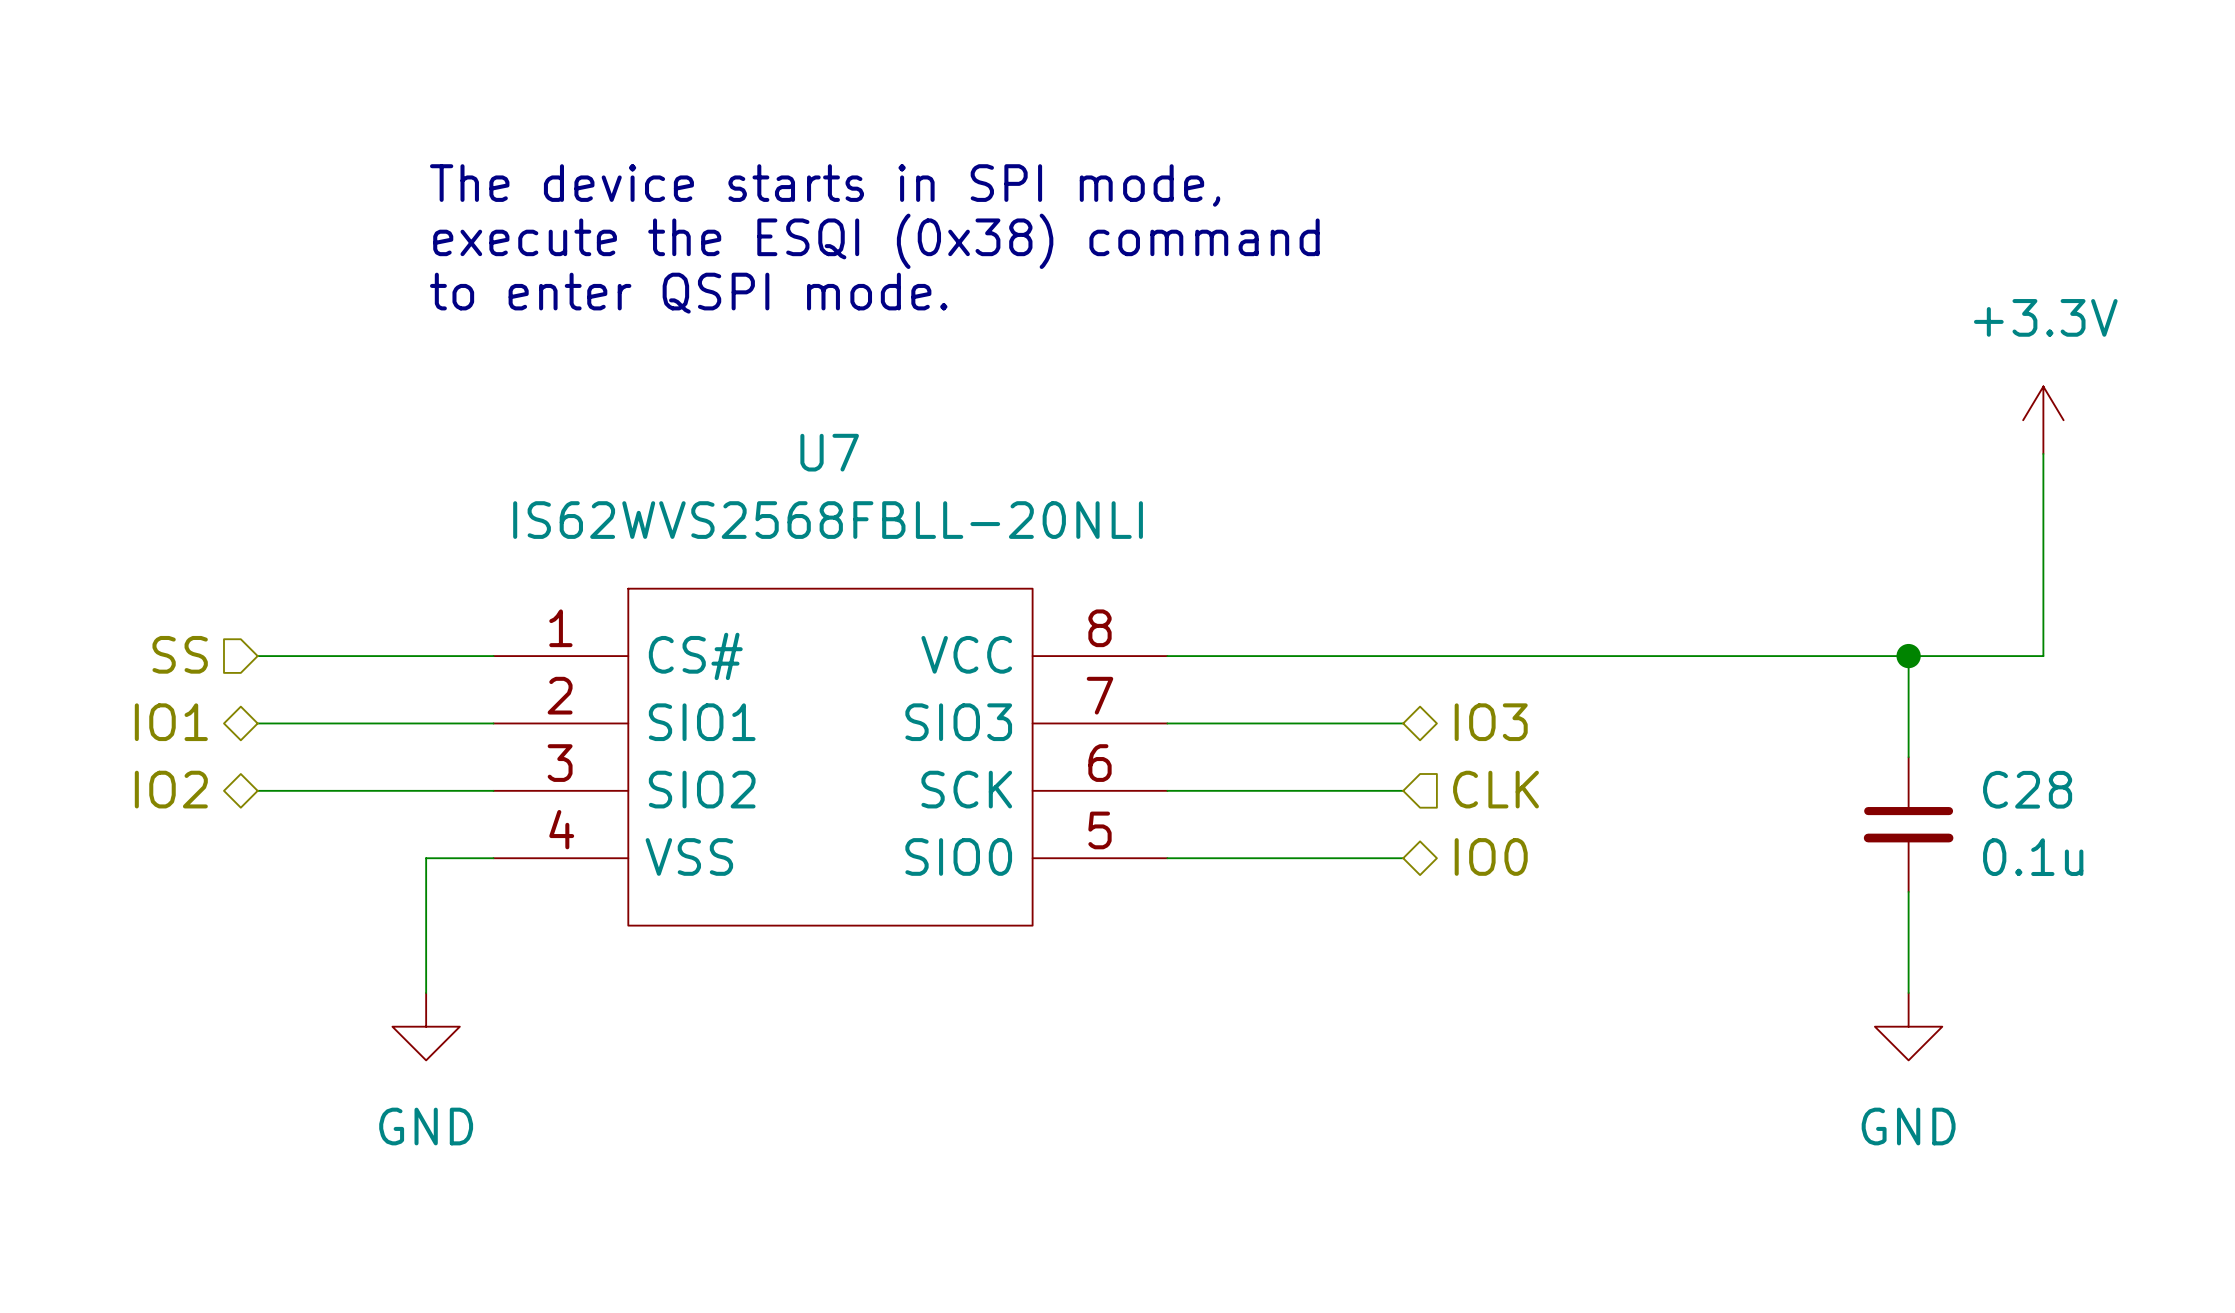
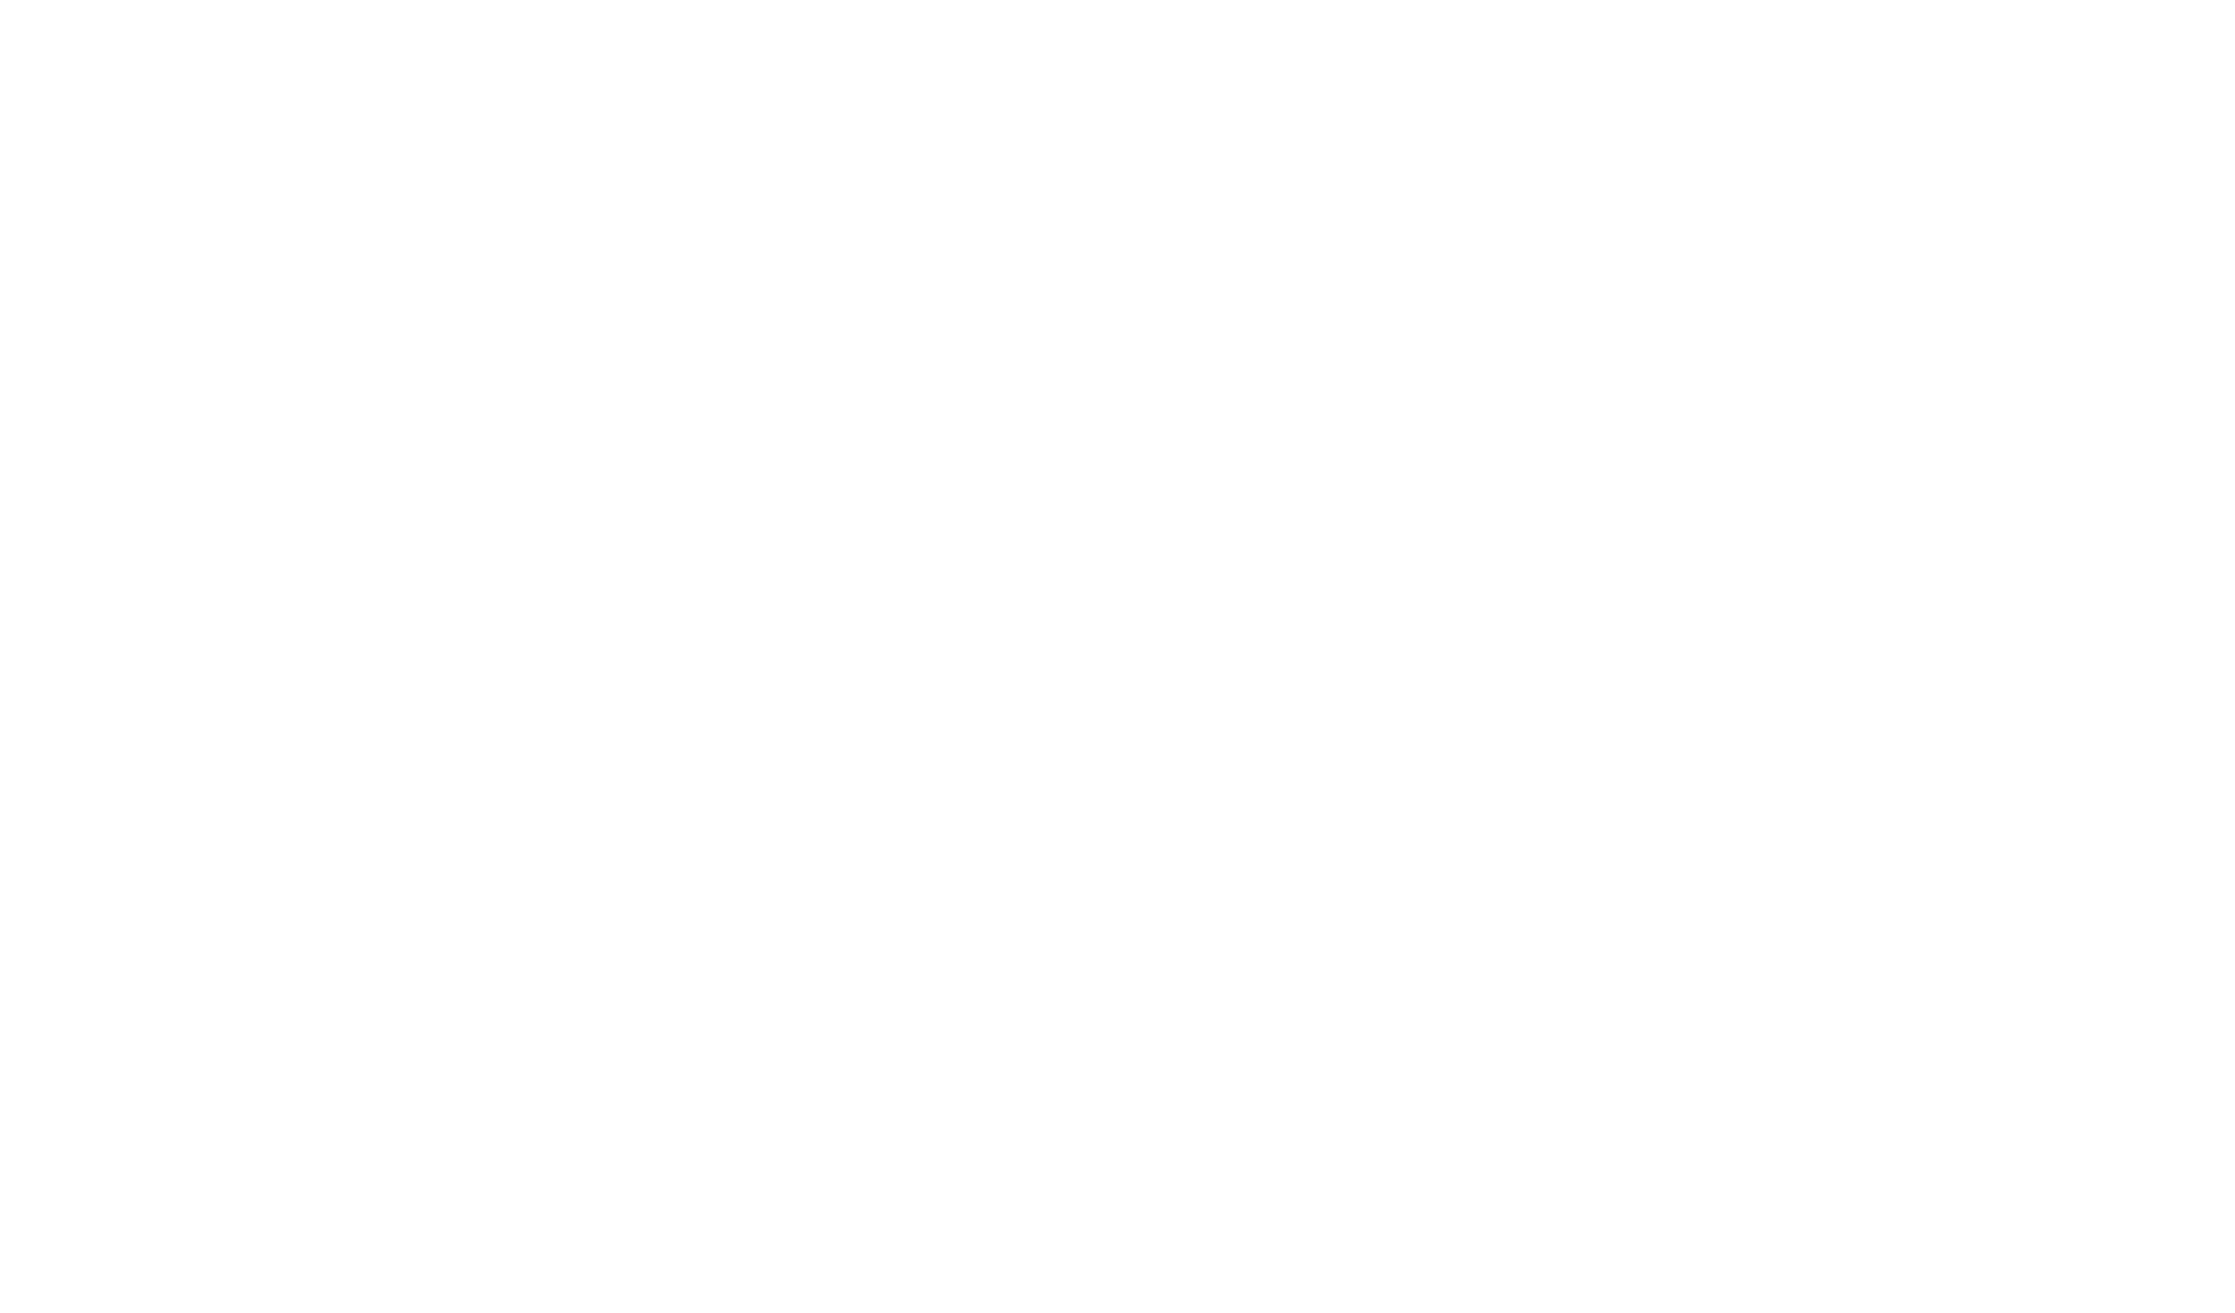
text: The device starts in SPI mode, (825, 185) -> none
text: execute the ESQI (0x38) command (876, 241) -> none
text: to enter QSPI mode. (688, 293) -> none
power symbol: +3.3V (2043, 420) -> none
wire: (2043, 453) (2043, 656) (1167, 656) -> none
hierarchical label: SS (180, 654) -> none
wire: (257, 656) (493, 656) -> none
wire: (1908, 656) (1908, 757) -> none
junction: (1908, 656) -> none
hierarchical label: IO1 (171, 722) -> none
hierarchical label: IO3 (1491, 722) -> none
wire: (257, 723) (493, 723) -> none
wire: (1167, 723) (1403, 723) -> none
U7: IS62WVS2568FBLL-20NLI (830, 757) -> none
hierarchical label: IO2 (171, 789) -> none
hierarchical label: CLK (1496, 789) -> none
wire: (257, 790) (493, 790) -> none
wire: (1167, 790) (1403, 790) -> none
C28: 0.1u (1908, 824) -> none
hierarchical label: IO0 (1491, 856) -> none
wire: (493, 858) (426, 858) (426, 993) -> none
wire: (1167, 858) (1403, 858) -> none
wire: (1908, 891) (1908, 993) -> none
power symbol: GND (426, 1026) -> none
power symbol: GND (1908, 1026) -> none

